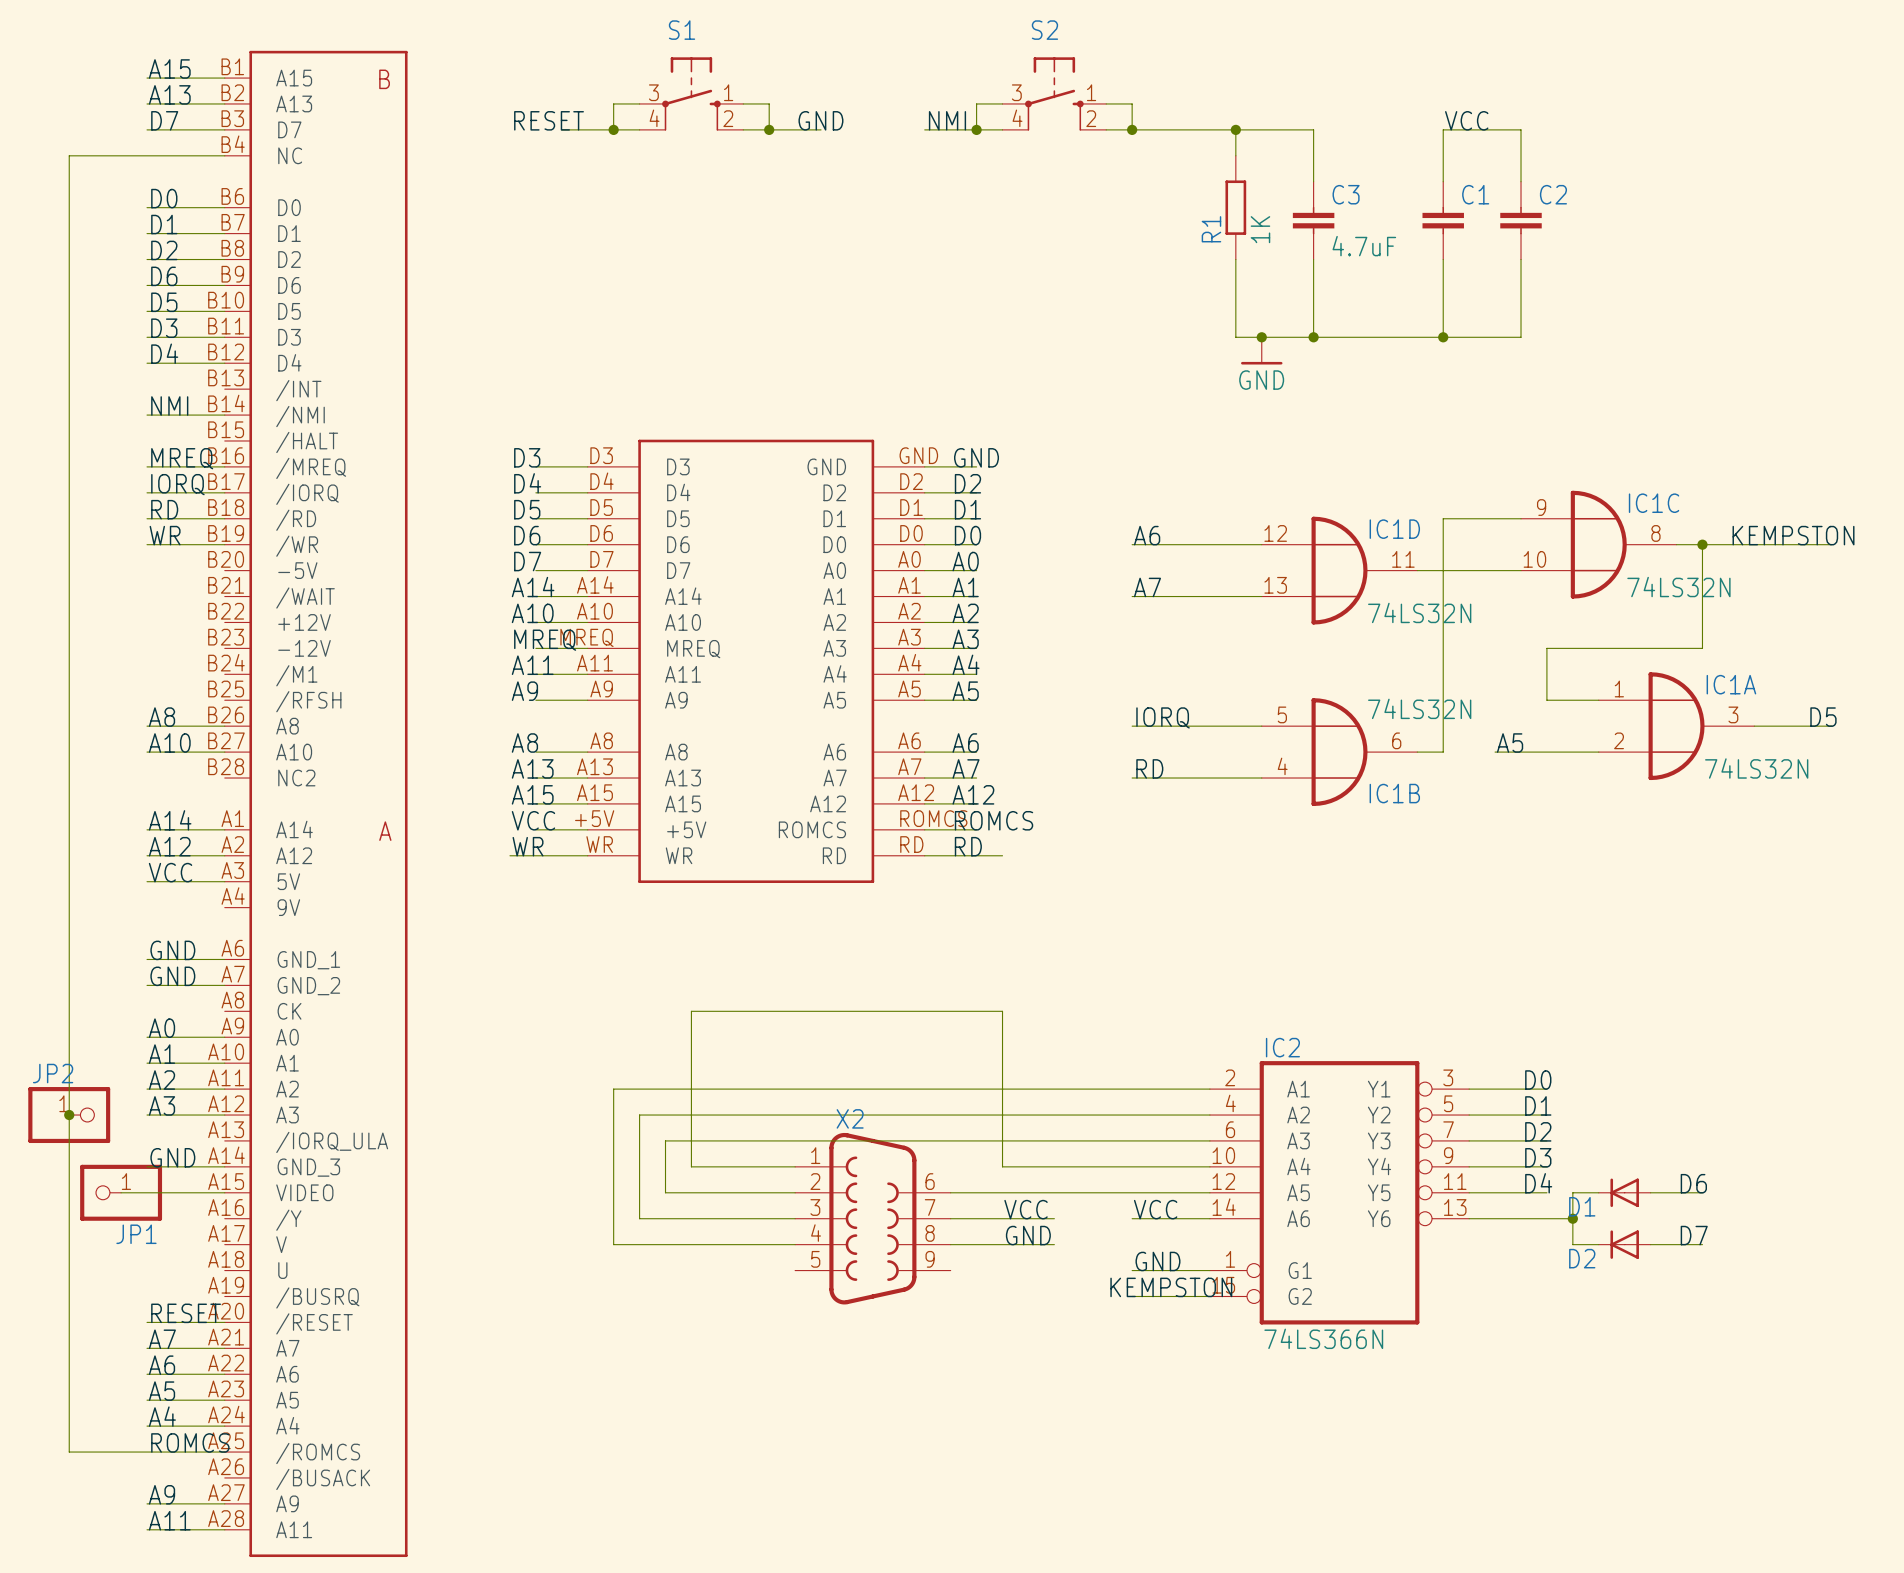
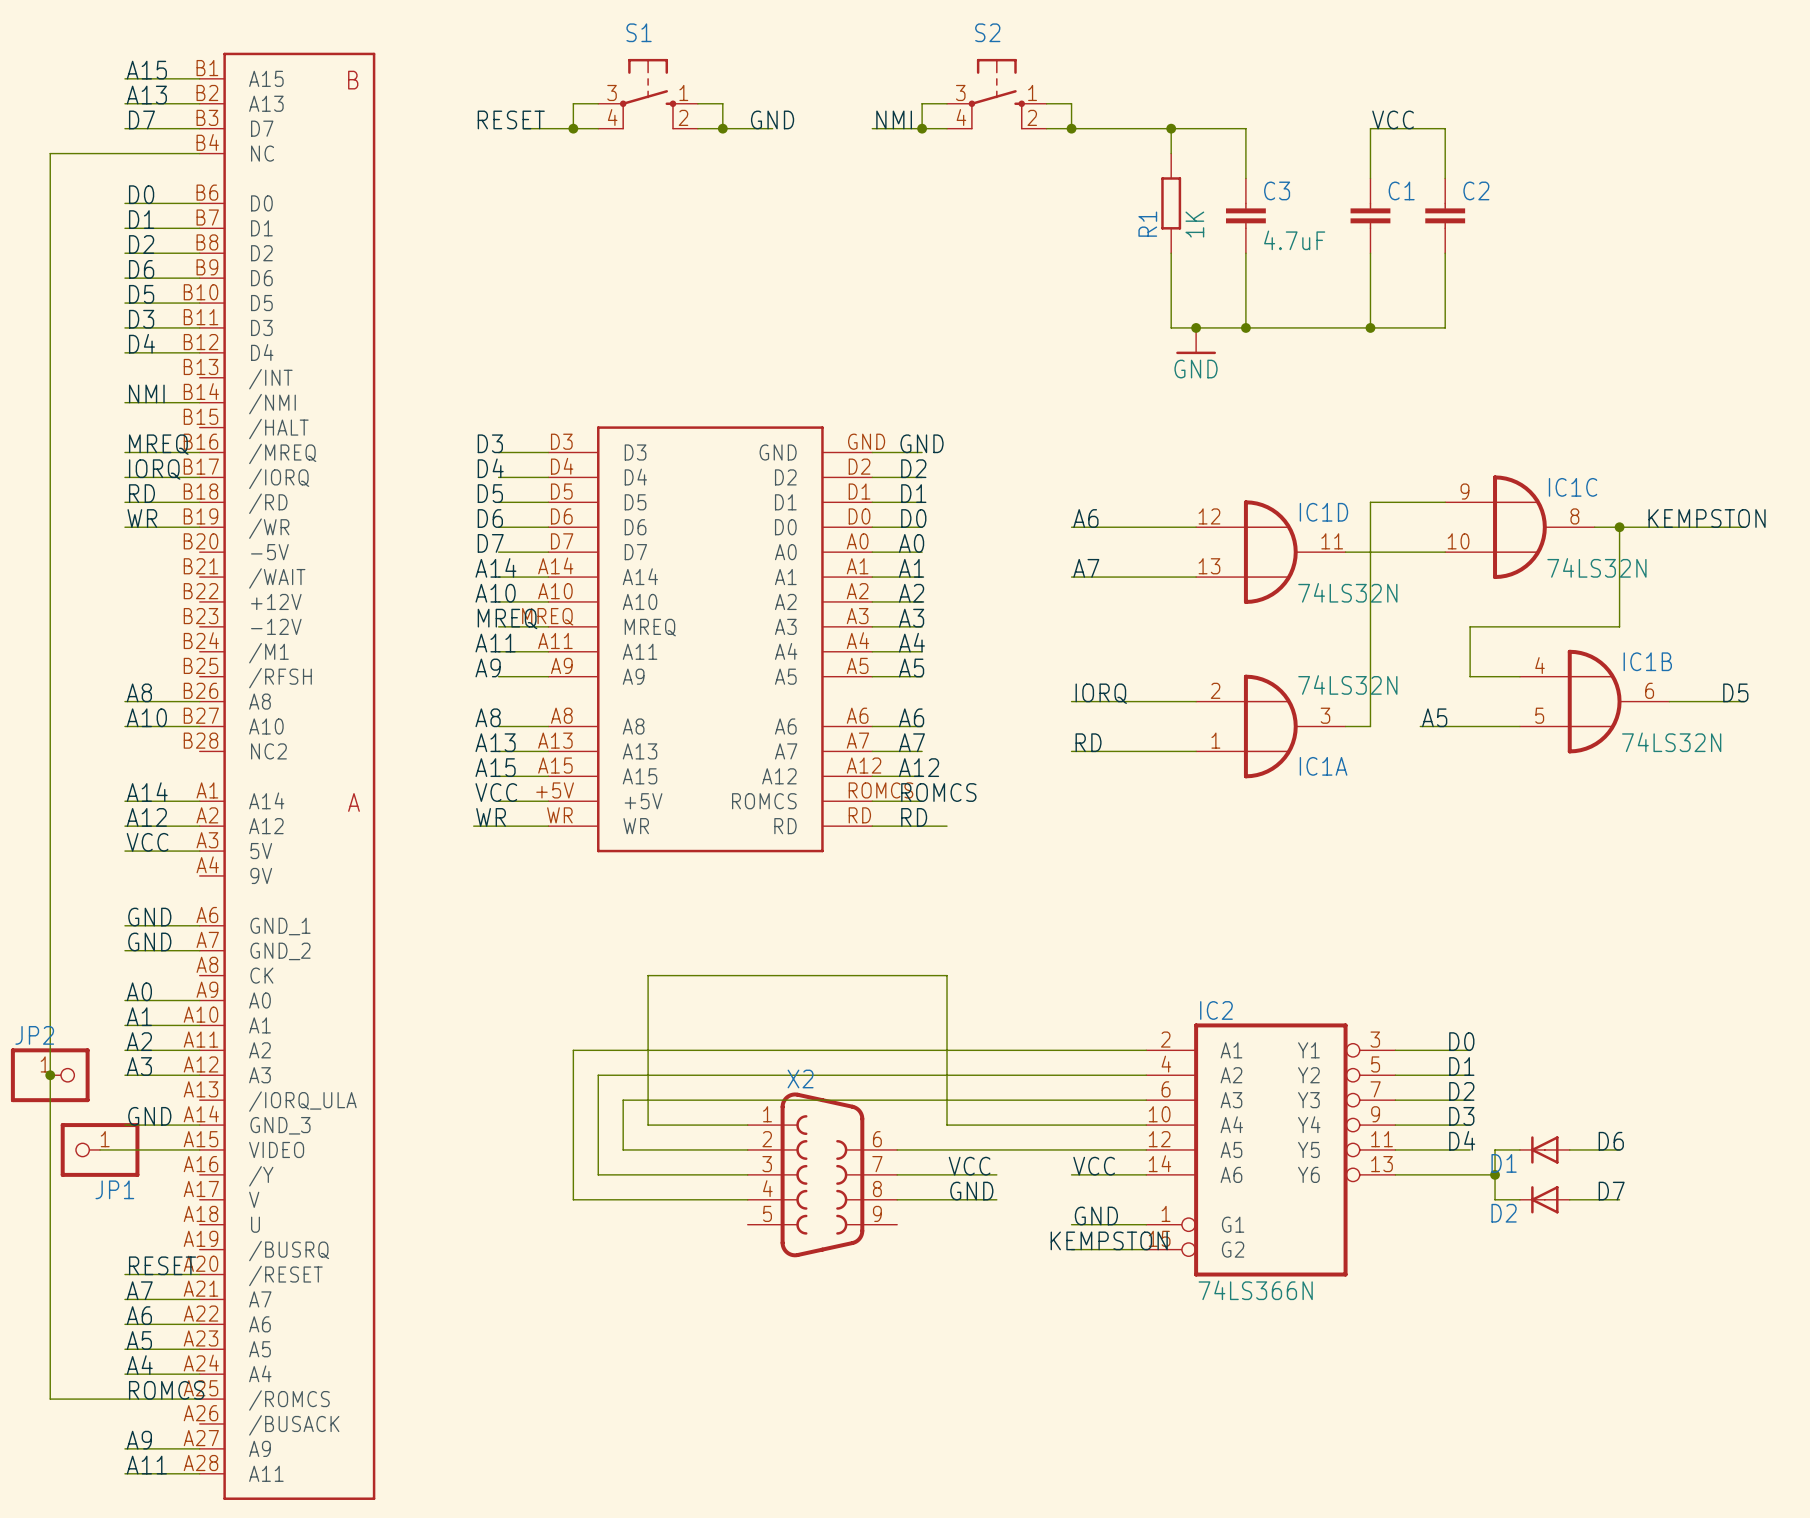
IC1A flip: as is (1676, 726) -> up-down (1270, 726)
IC1A position: (1676, 726) -> (1270, 726)
IC1B flip: as is (1339, 752) -> up-down (1594, 701)
IC1B position: (1339, 752) -> (1594, 701)

